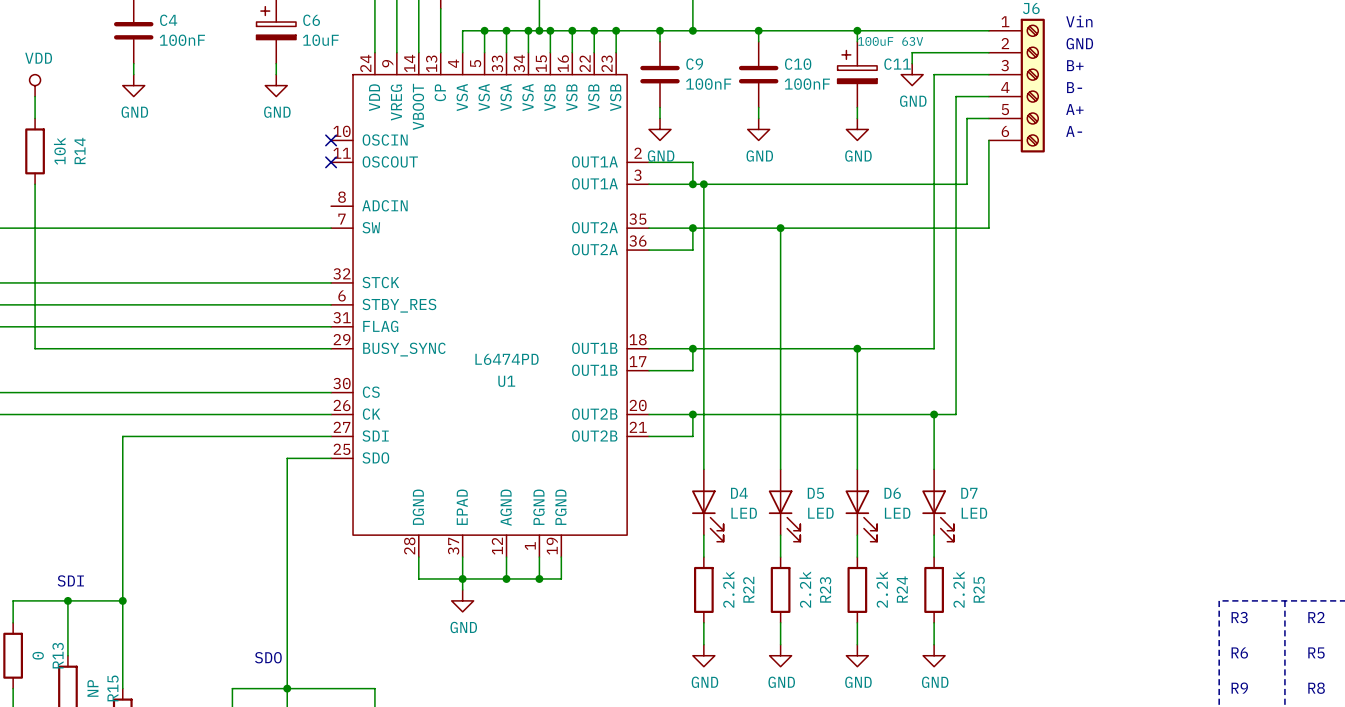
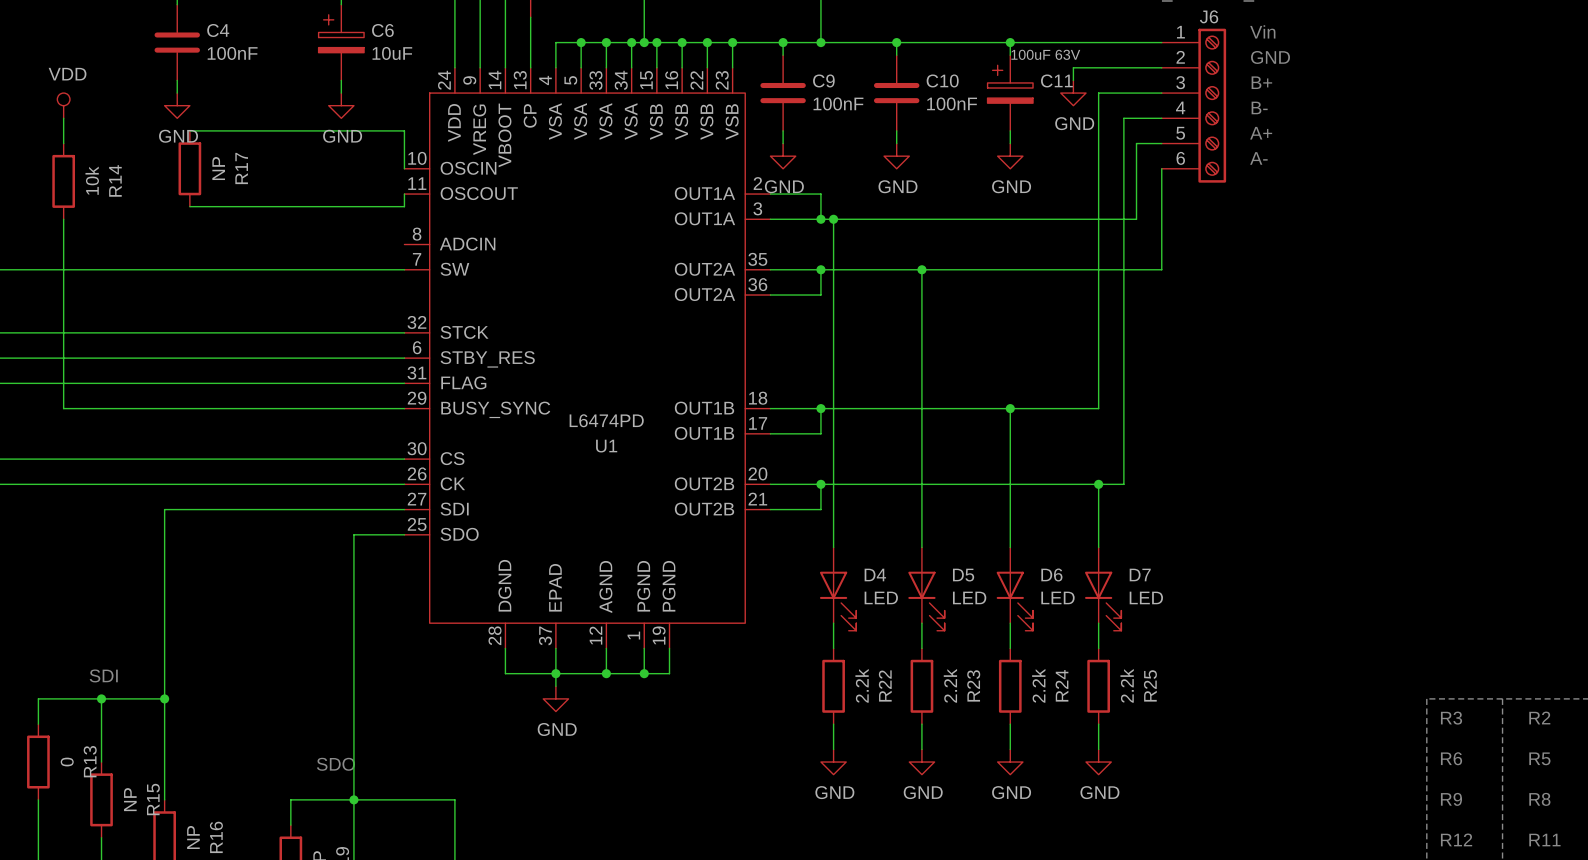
wire: none -> (189, 130) (404, 130) (404, 168)
R17: none -> NP (189, 168)
no-connect mark: (331, 140) -> none
wire: none -> (404, 194) (404, 206) (189, 206)
no-connect mark: (331, 162) -> none

